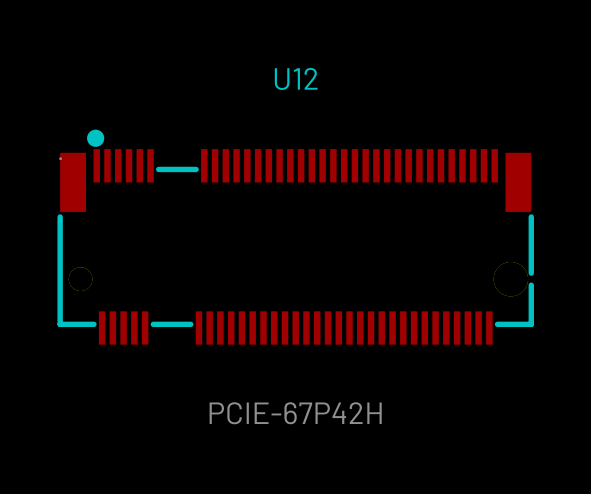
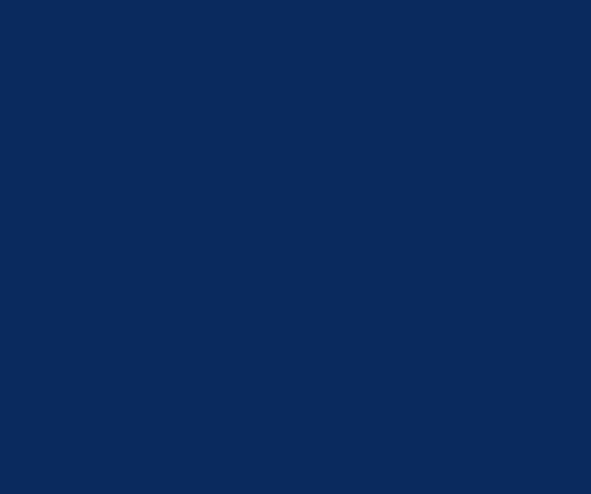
U12: PCIE-67P42H (295, 237) -> none

